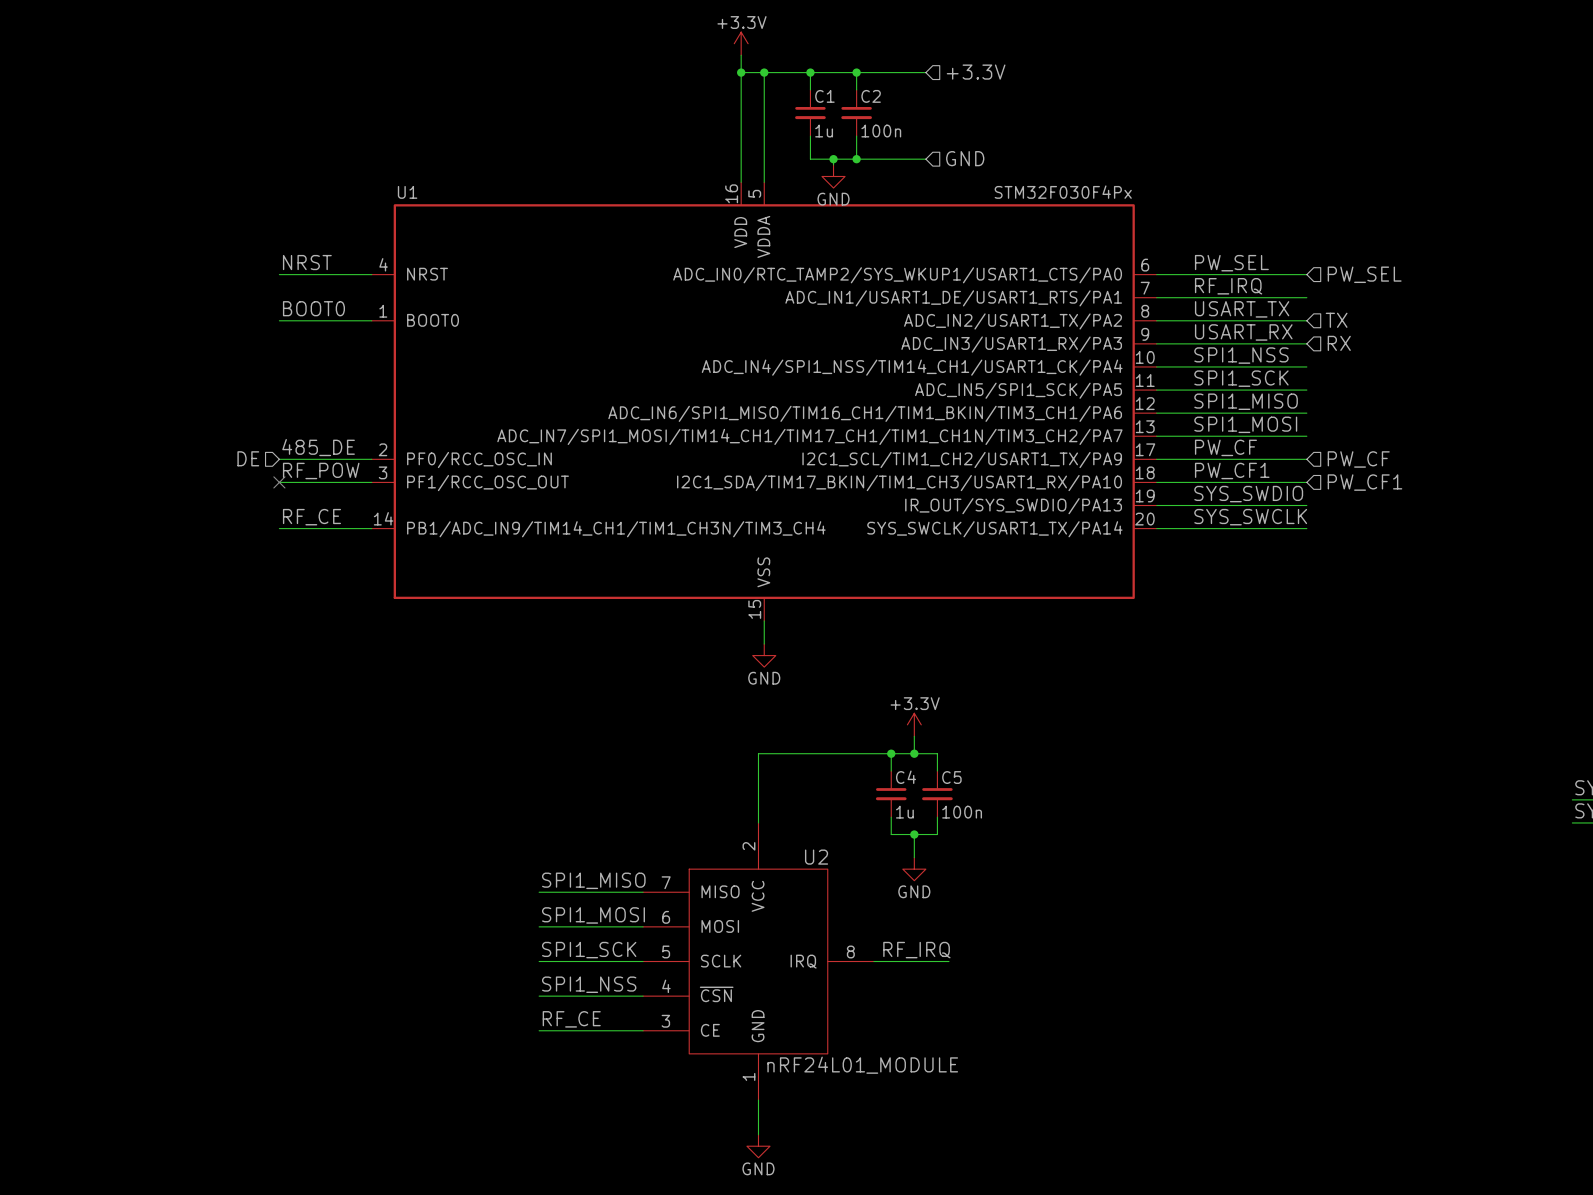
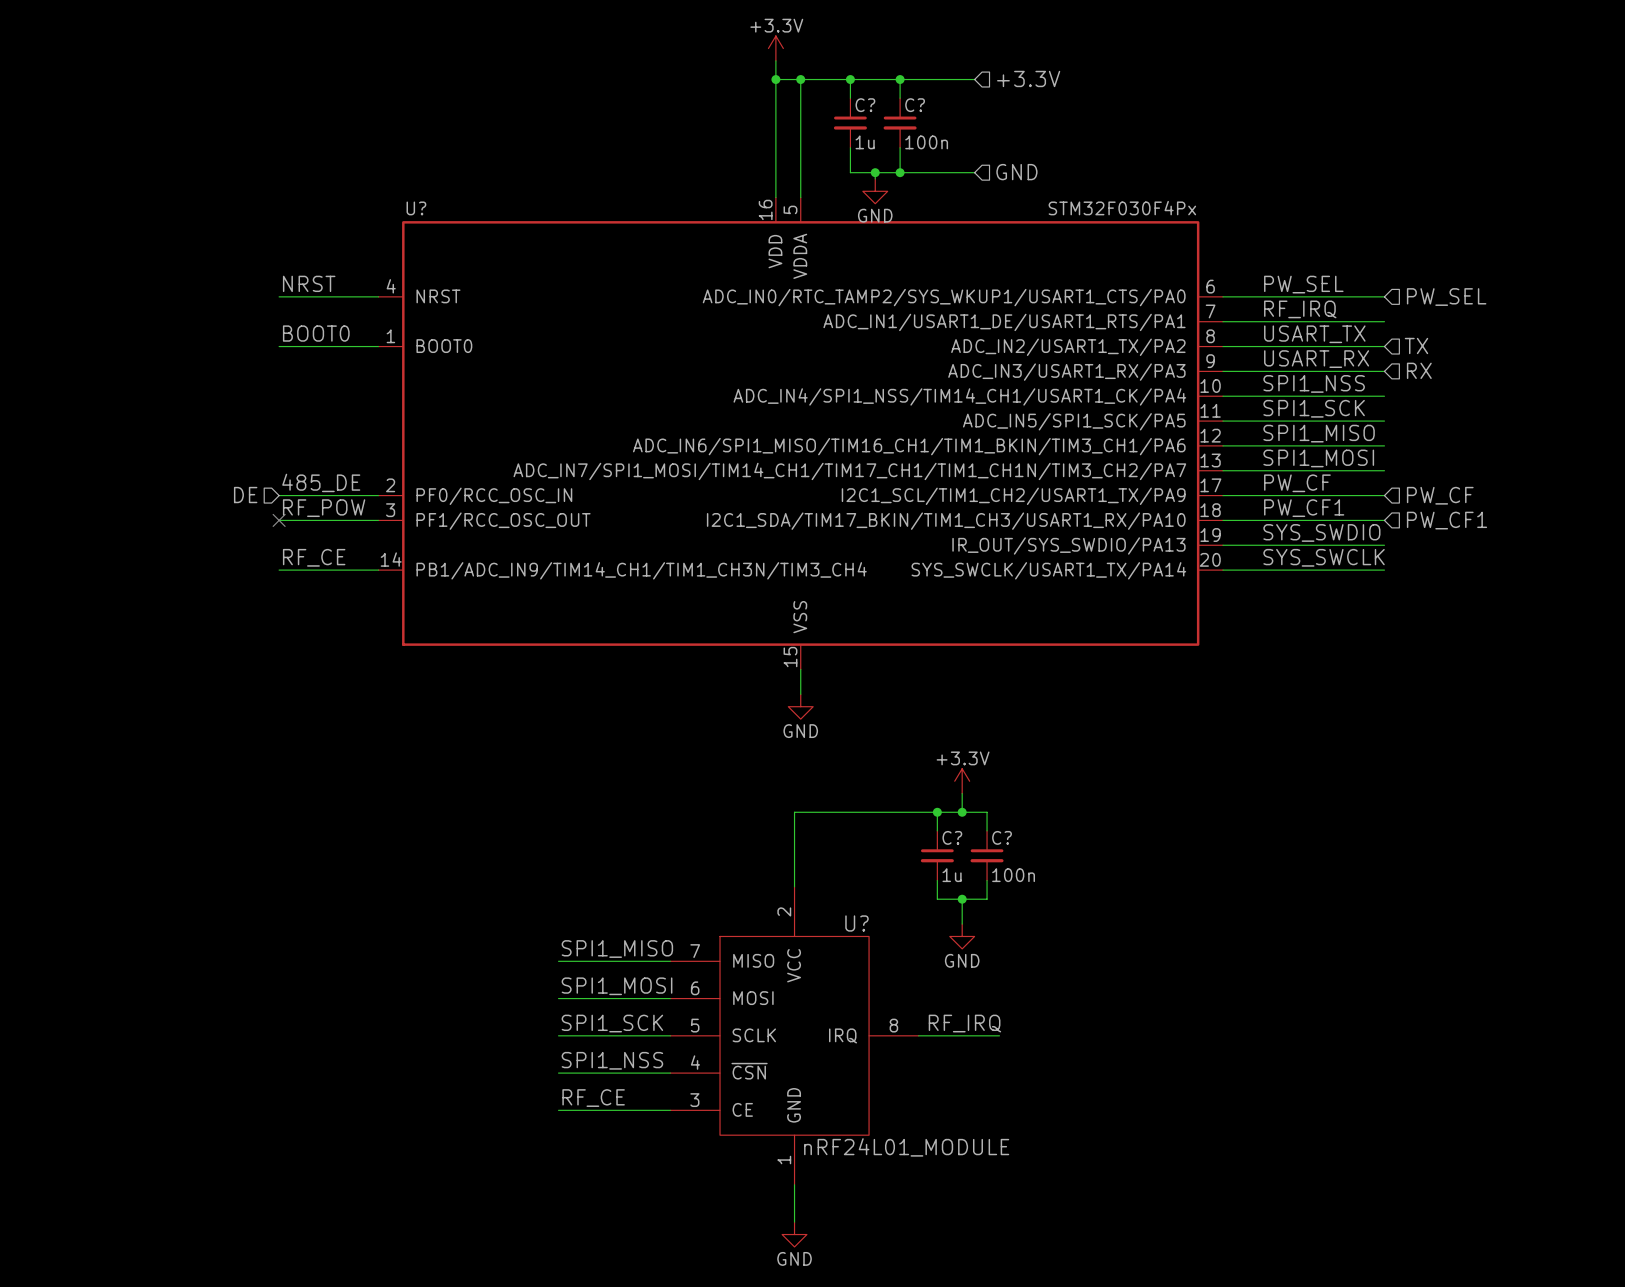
C1 name: C1 (824, 96) -> C? (865, 105)
C2 name: C2 (871, 96) -> C? (915, 105)
U1 name: U1 (407, 192) -> U? (416, 208)
C4 name: C4 (906, 777) -> C? (952, 837)
C5 name: C5 (951, 777) -> C? (1002, 837)
U2 name: U2 (816, 857) -> U? (856, 923)

